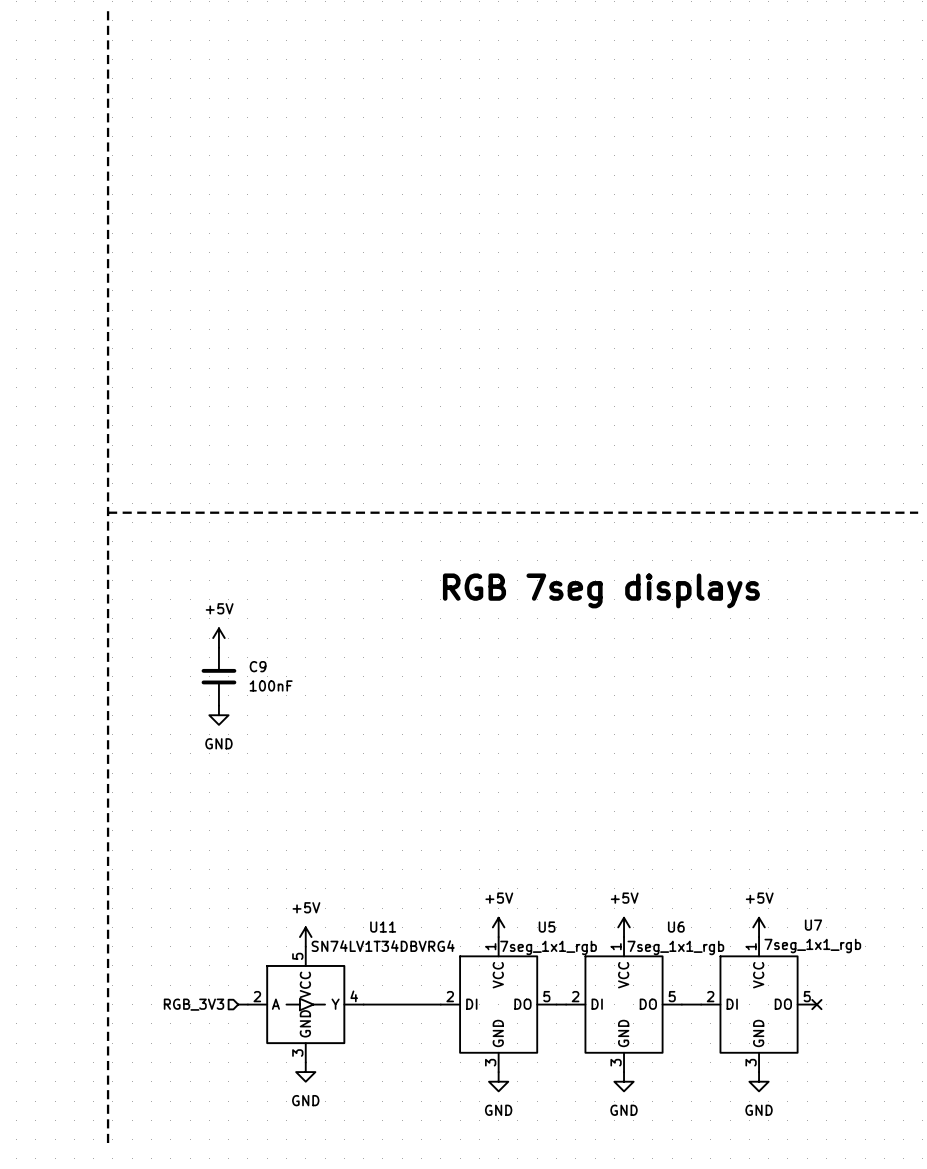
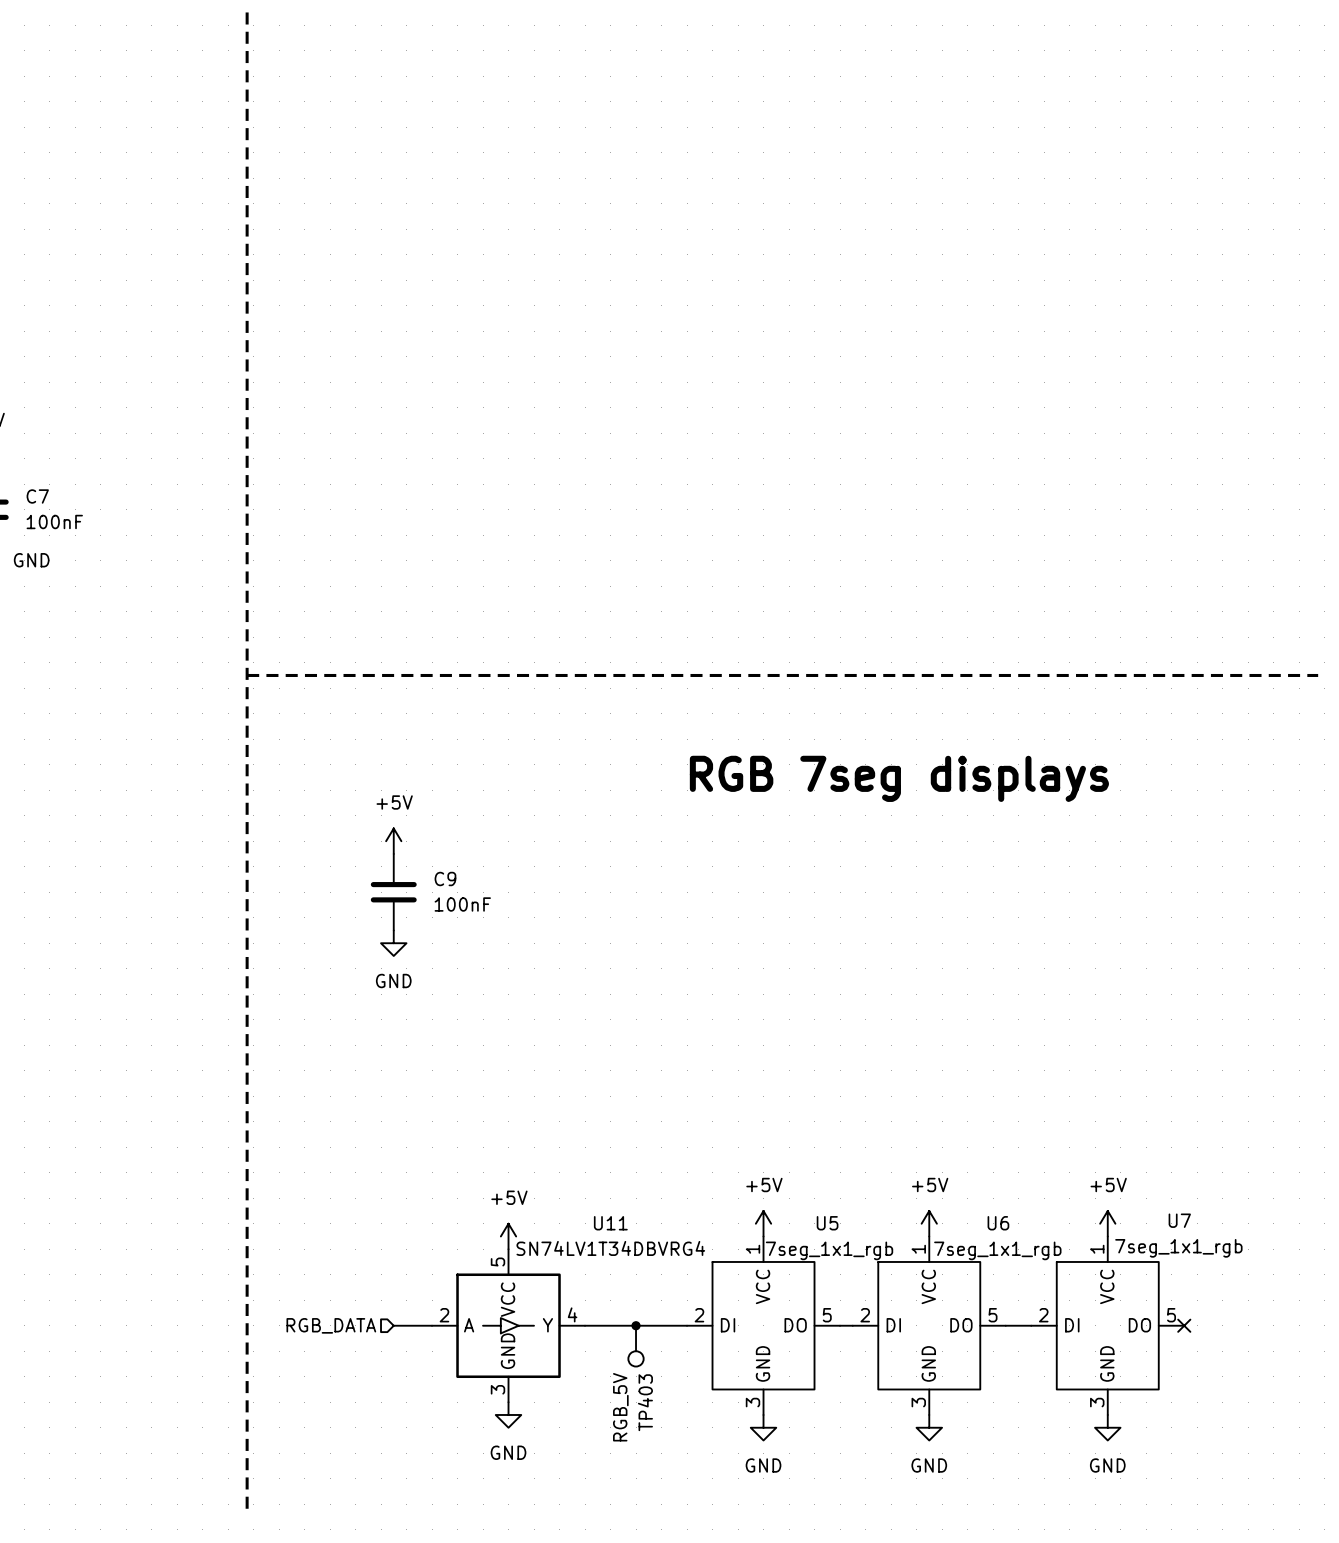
hierarchical label: none -> RGB_DATA (331, 1325)
hierarchical label: RGB_3V3 (194, 1004) -> none
wire: none -> (393, 1325) (419, 1325)
junction: none -> (636, 1325)
TP403: none -> RGB_5V (636, 1346)

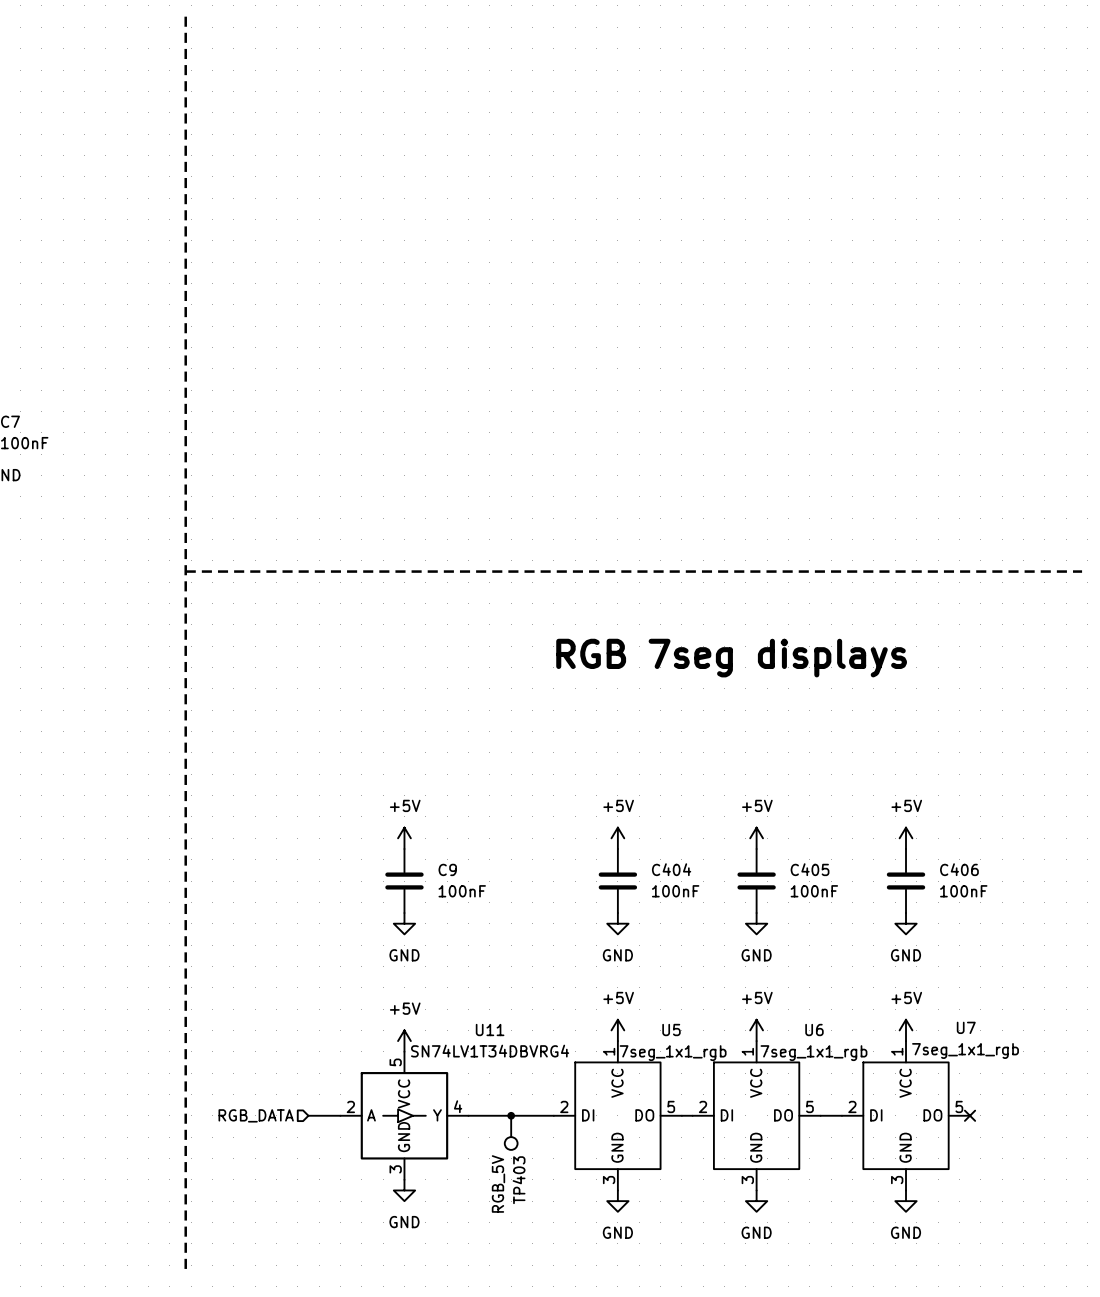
power symbol position: +5V (393, 841) -> +5V (404, 838)
C9 position: (393, 892) -> (404, 881)
power symbol position: GND (393, 943) -> GND (404, 923)
power symbol: none -> +5V (617, 838)
power symbol: none -> +5V (756, 838)
power symbol: none -> +5V (906, 838)
C404: none -> 100nF (617, 881)
C405: none -> 100nF (756, 881)
C406: none -> 100nF (906, 881)
power symbol: none -> GND (617, 923)
power symbol: none -> GND (756, 923)
power symbol: none -> GND (906, 923)

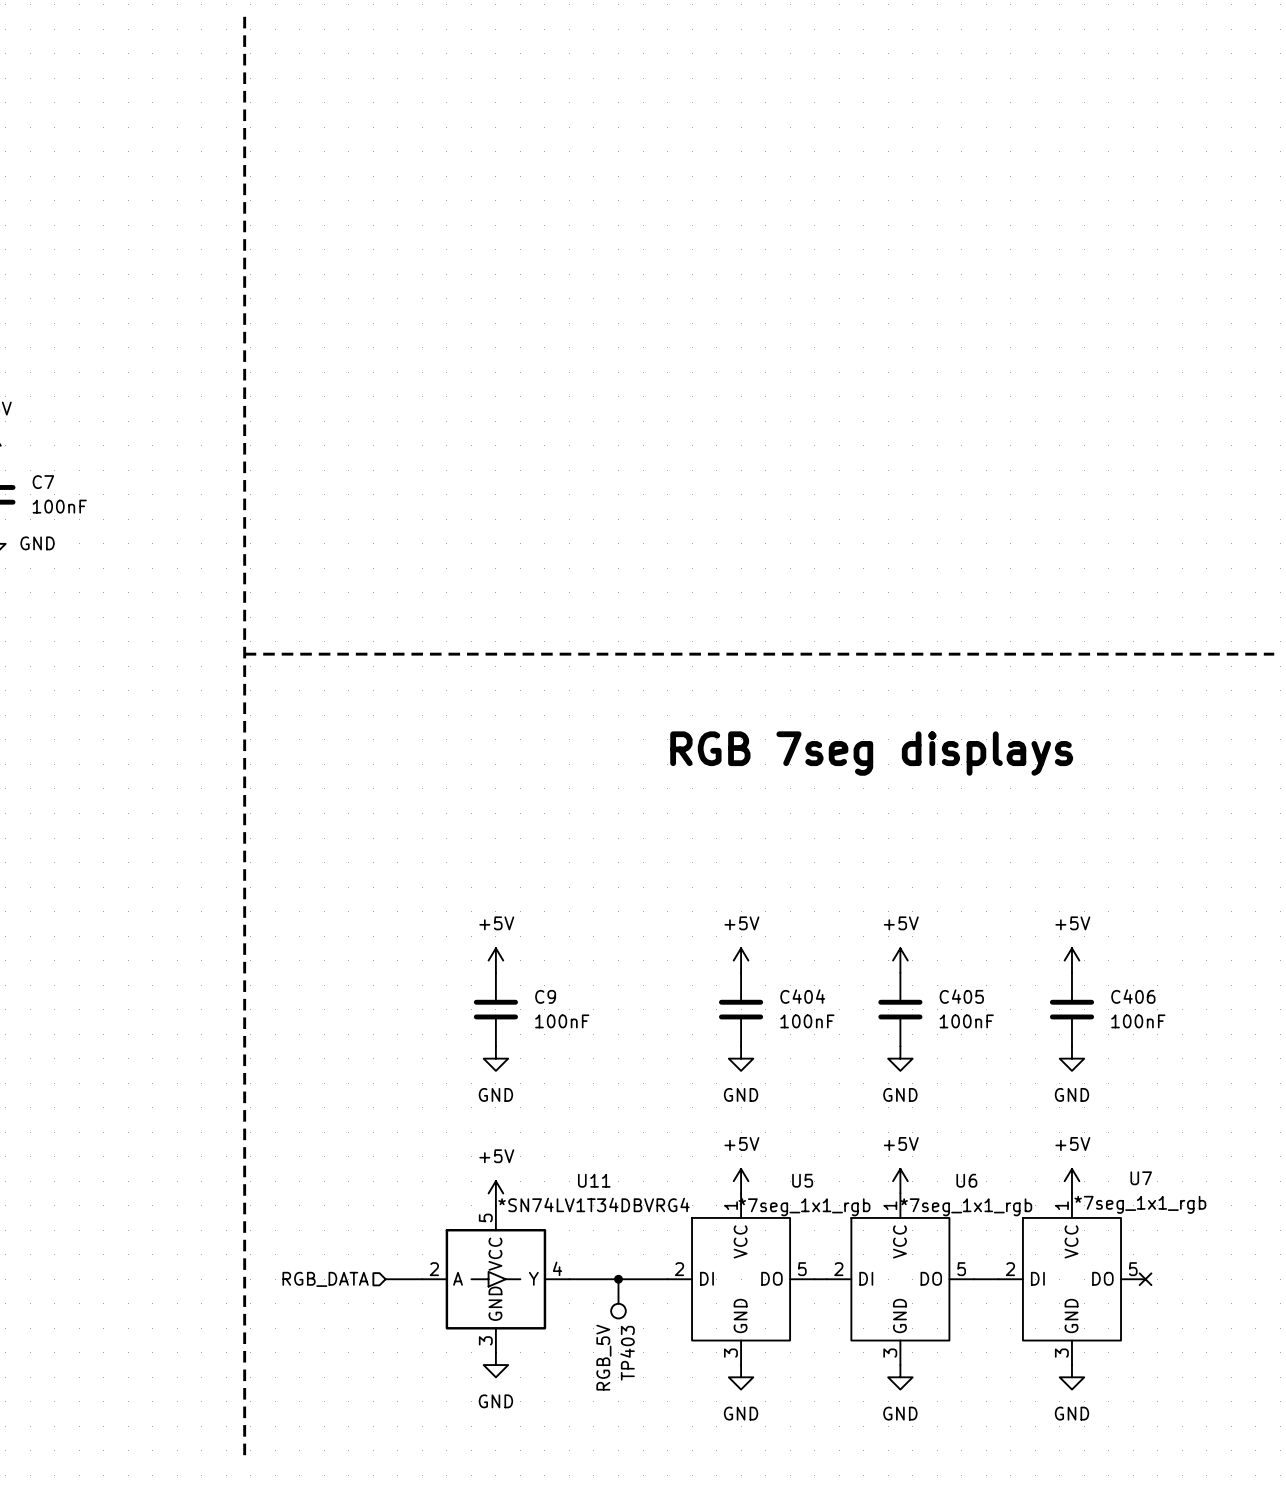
U7 value: 7seg_1x1_rgb (965, 1050) -> *7seg_1x1_rgb (1140, 1204)
U11 value: SN74LV1T34DBVRG4 (490, 1051) -> *SN74LV1T34DBVRG4 (593, 1204)
U5 value: 7seg_1x1_rgb (673, 1053) -> *7seg_1x1_rgb (804, 1207)
U6 value: 7seg_1x1_rgb (813, 1053) -> *7seg_1x1_rgb (966, 1207)

